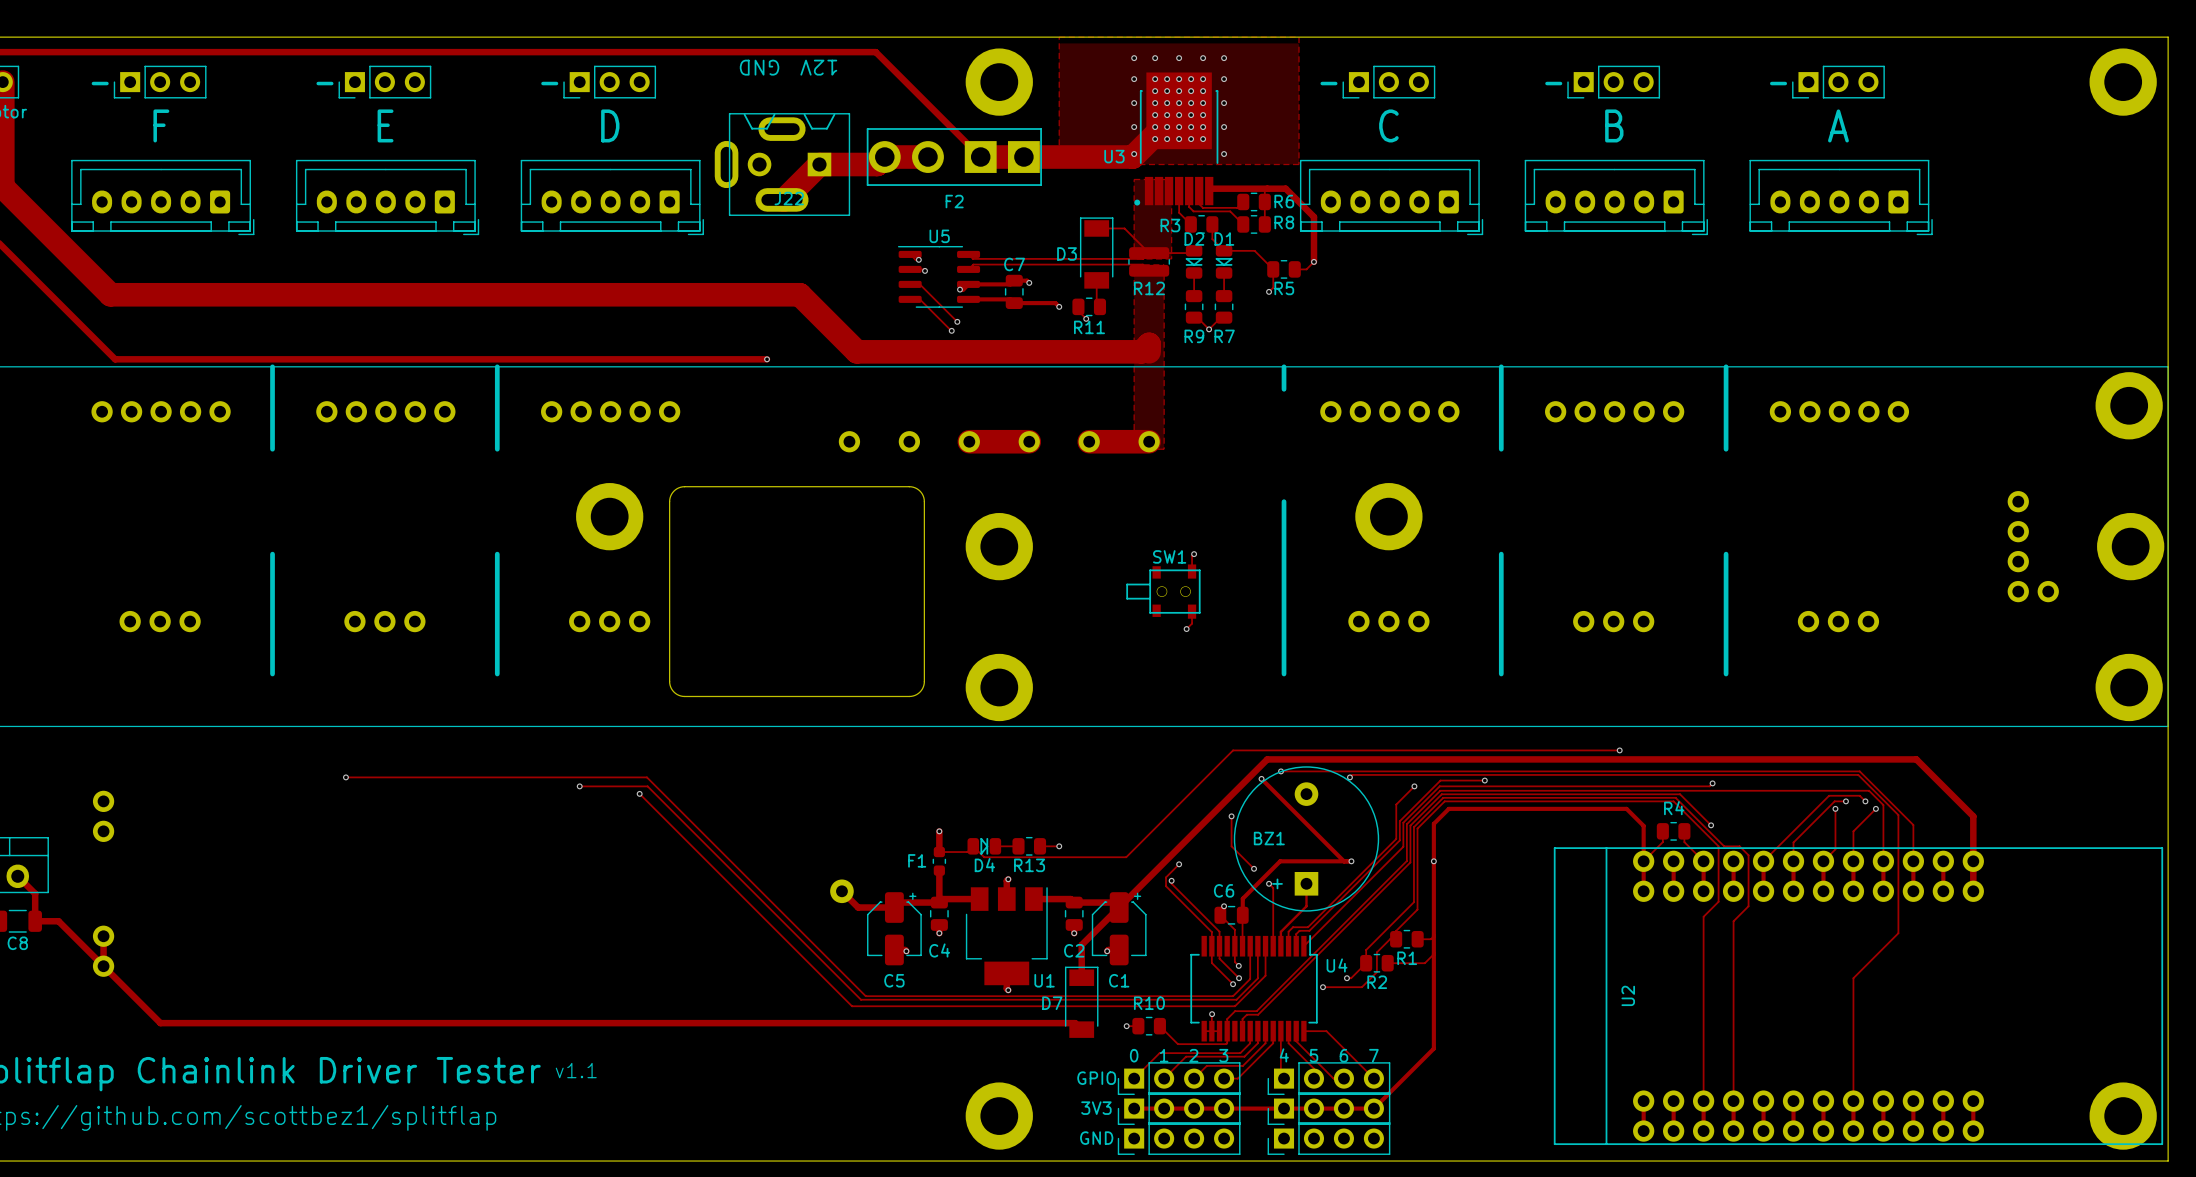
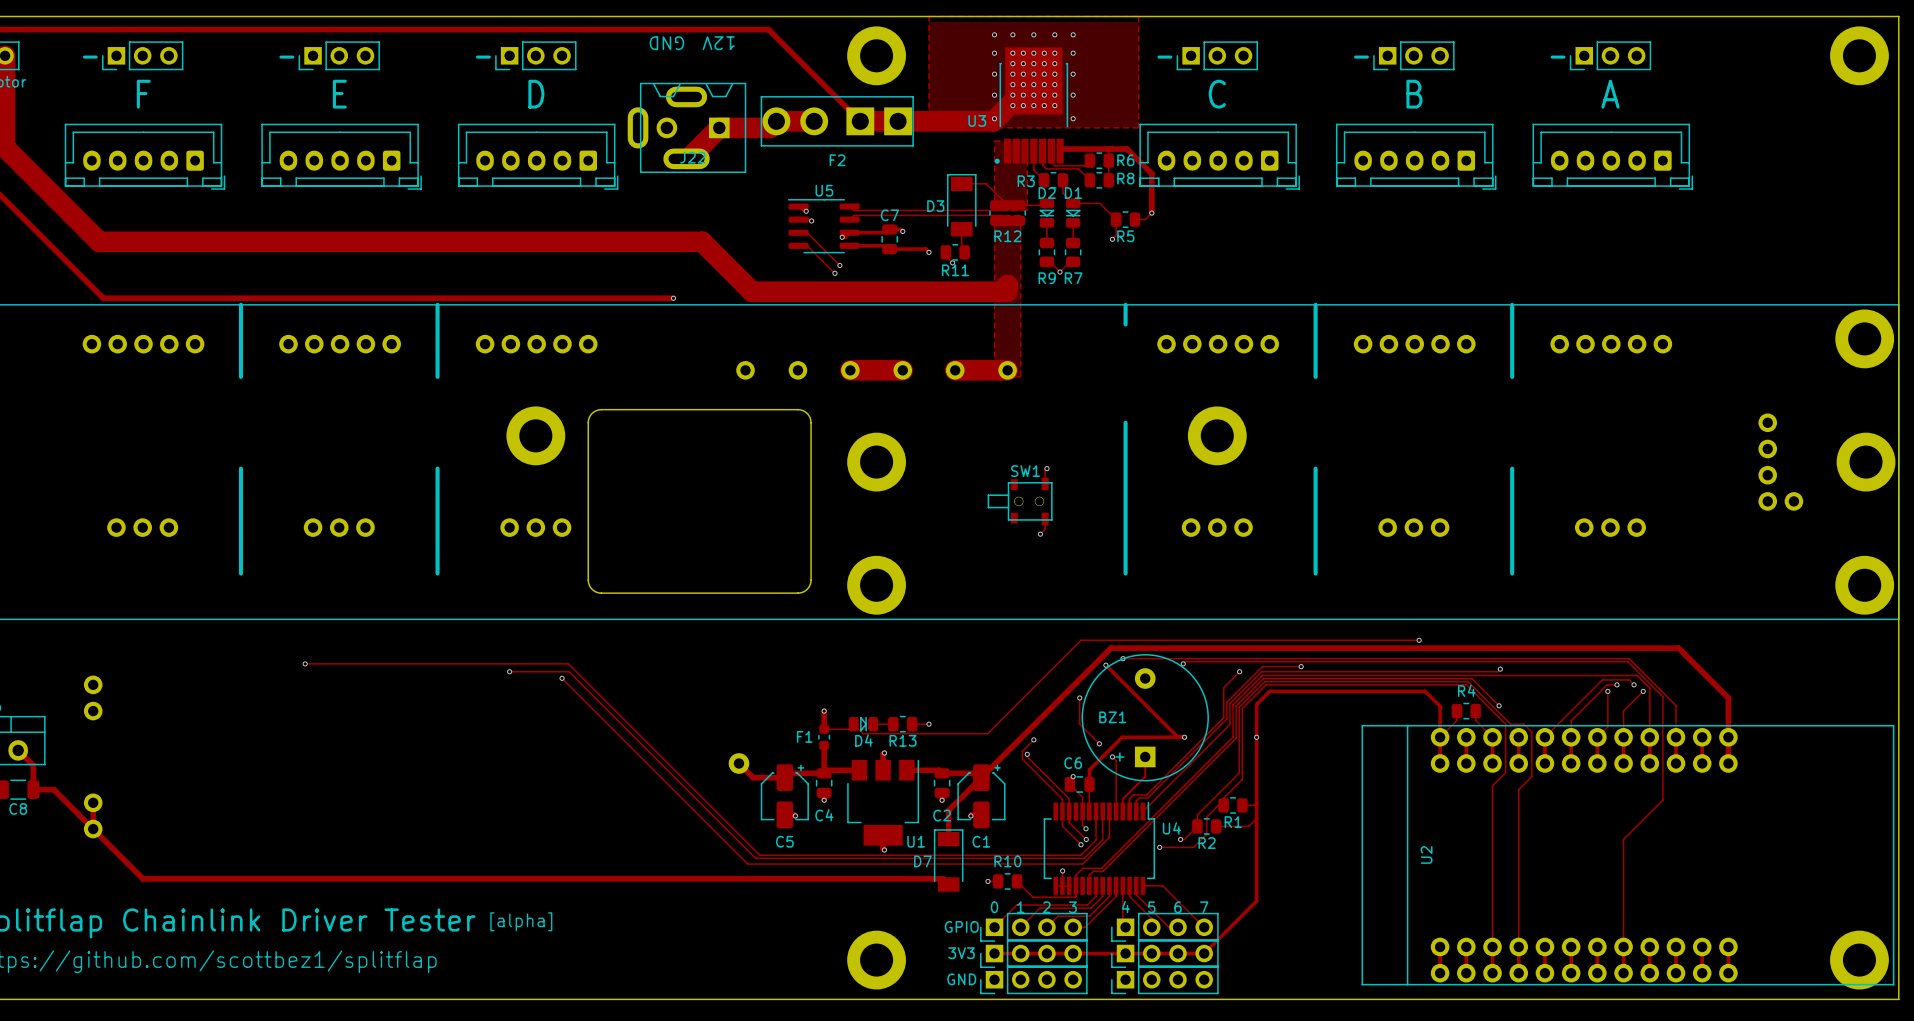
text: v1.1 (576, 1070) -> [alpha] (521, 921)

